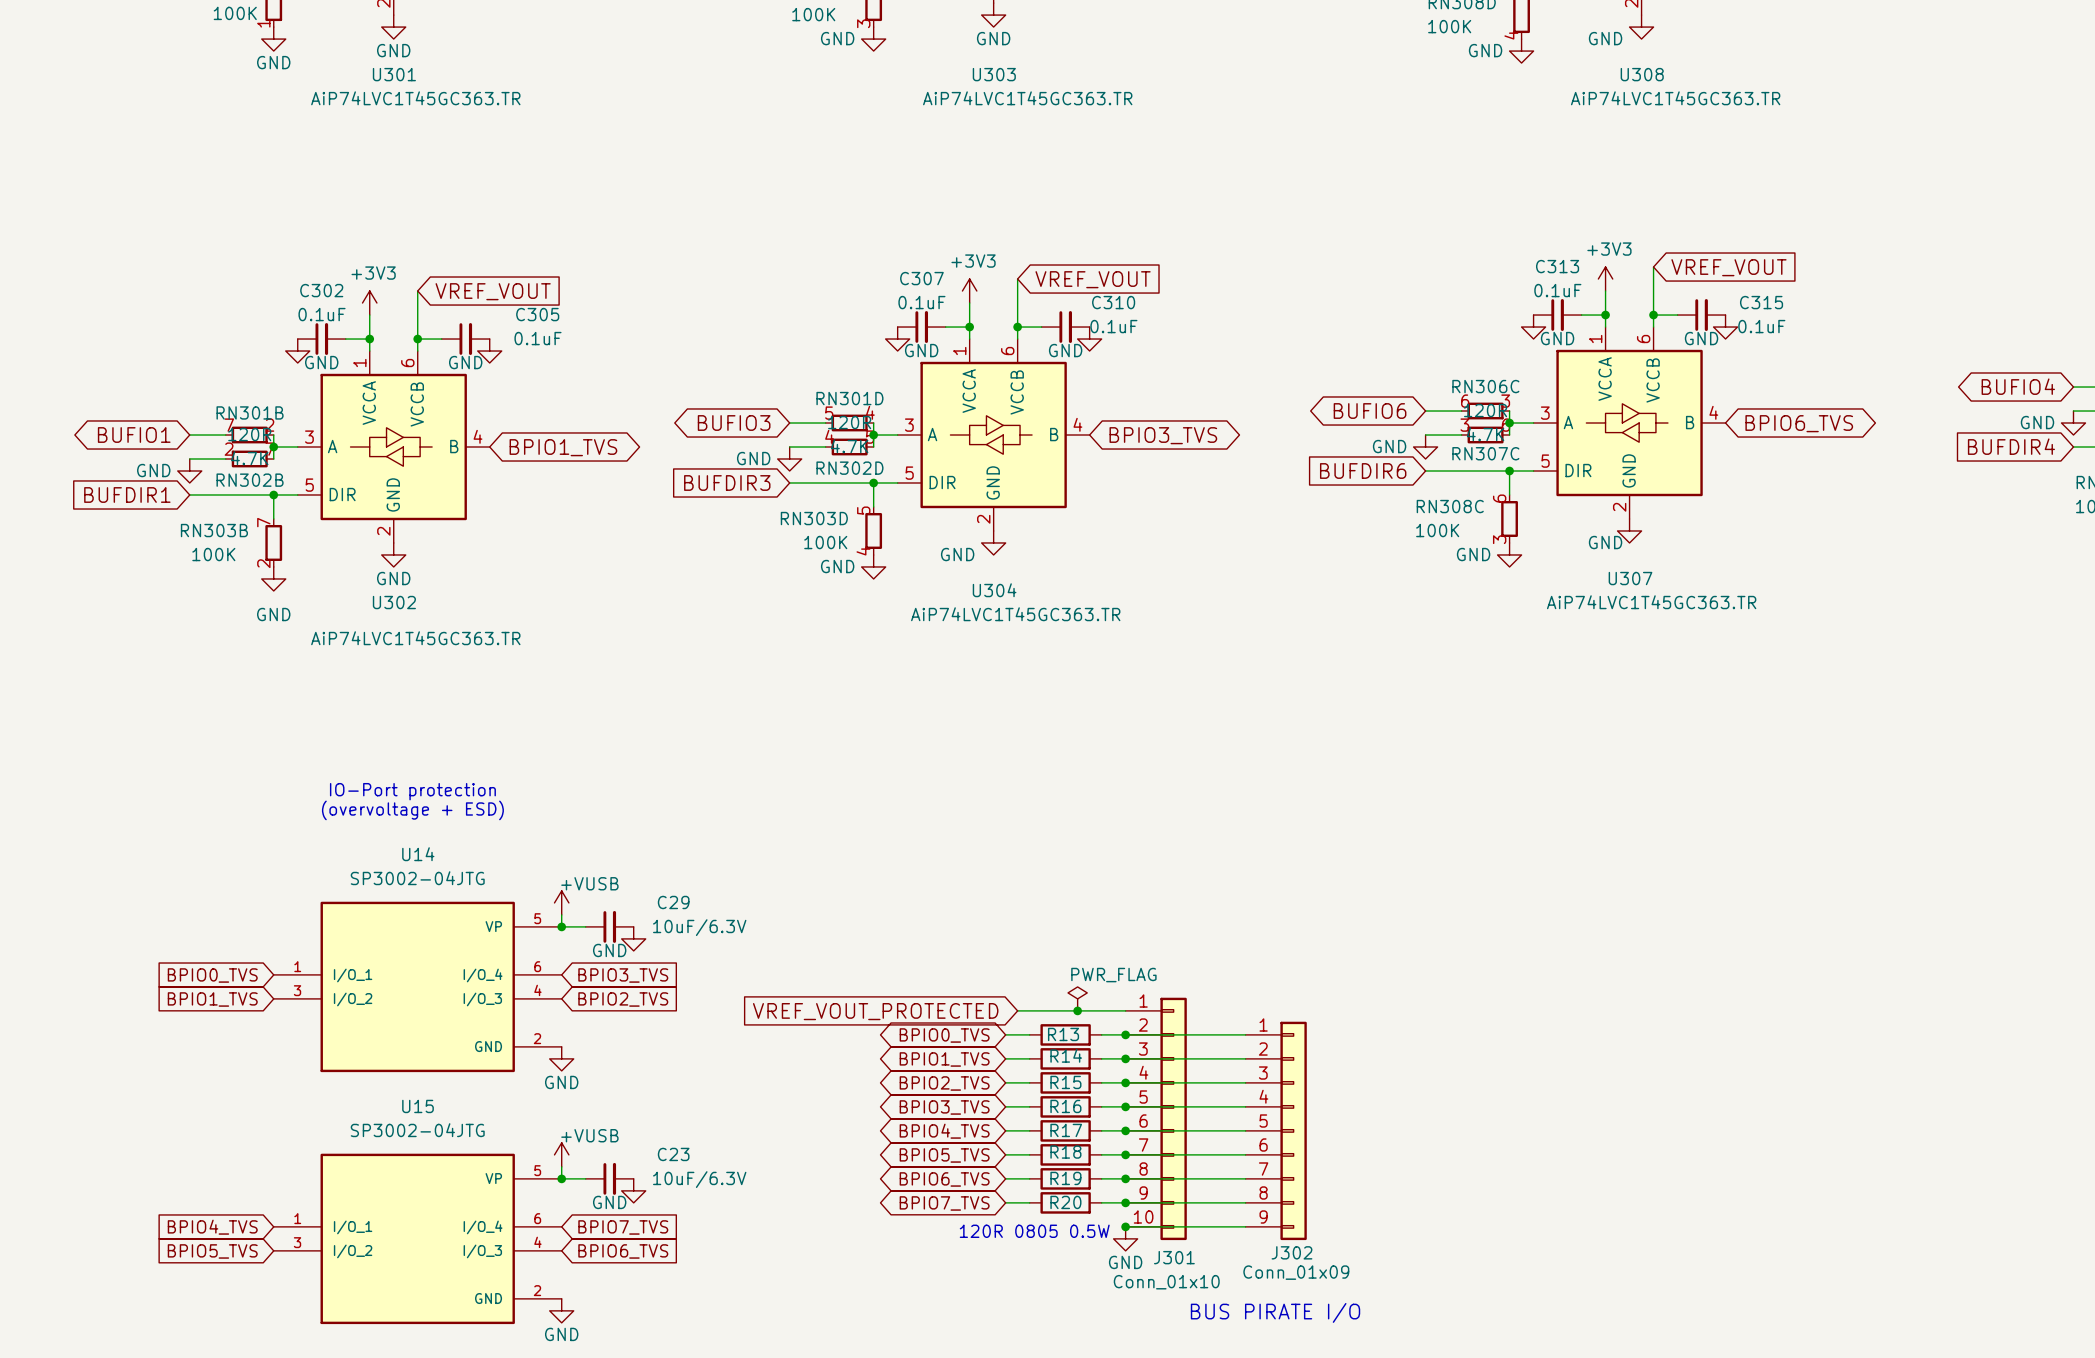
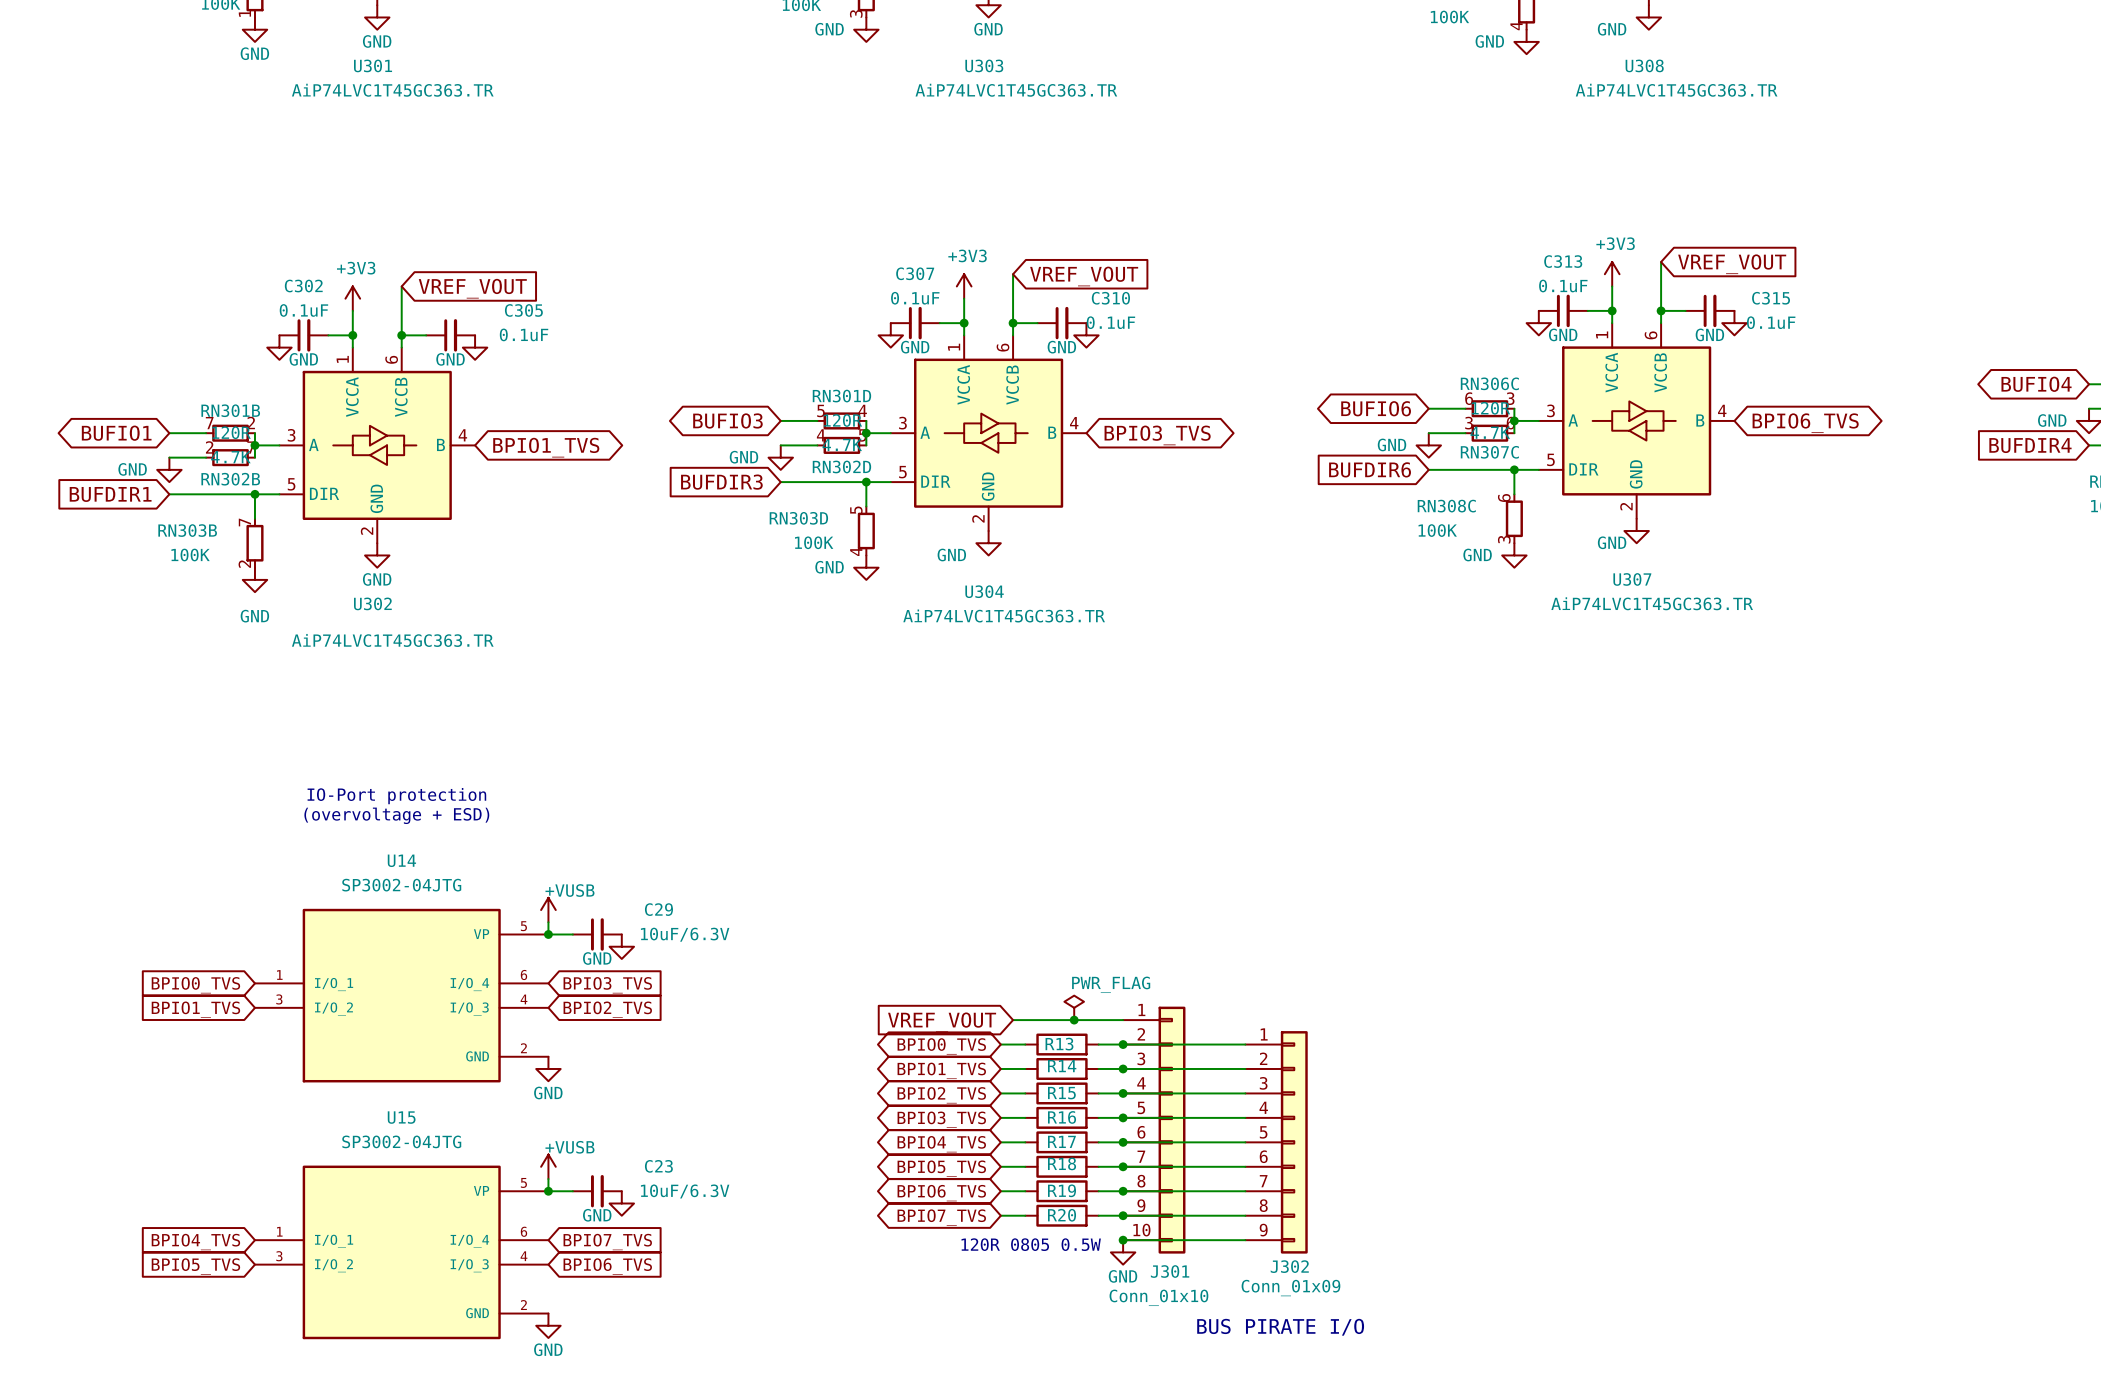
global label: VREF_VOUT_PROTECTED (875, 1011) -> VREF_VOUT (942, 1022)

